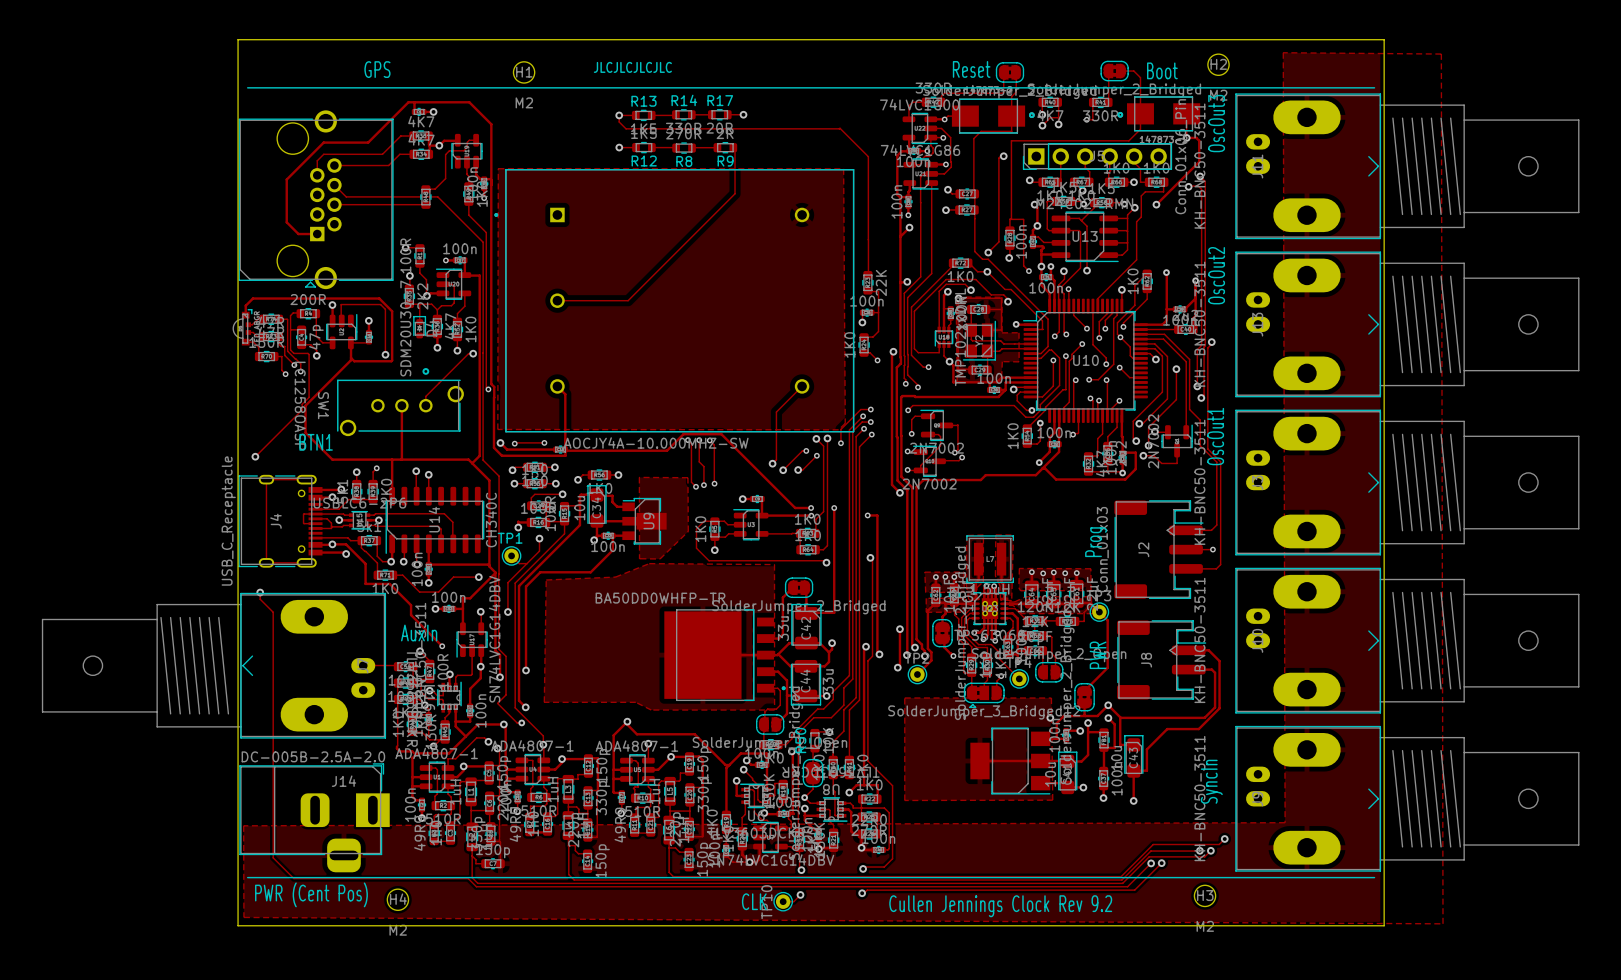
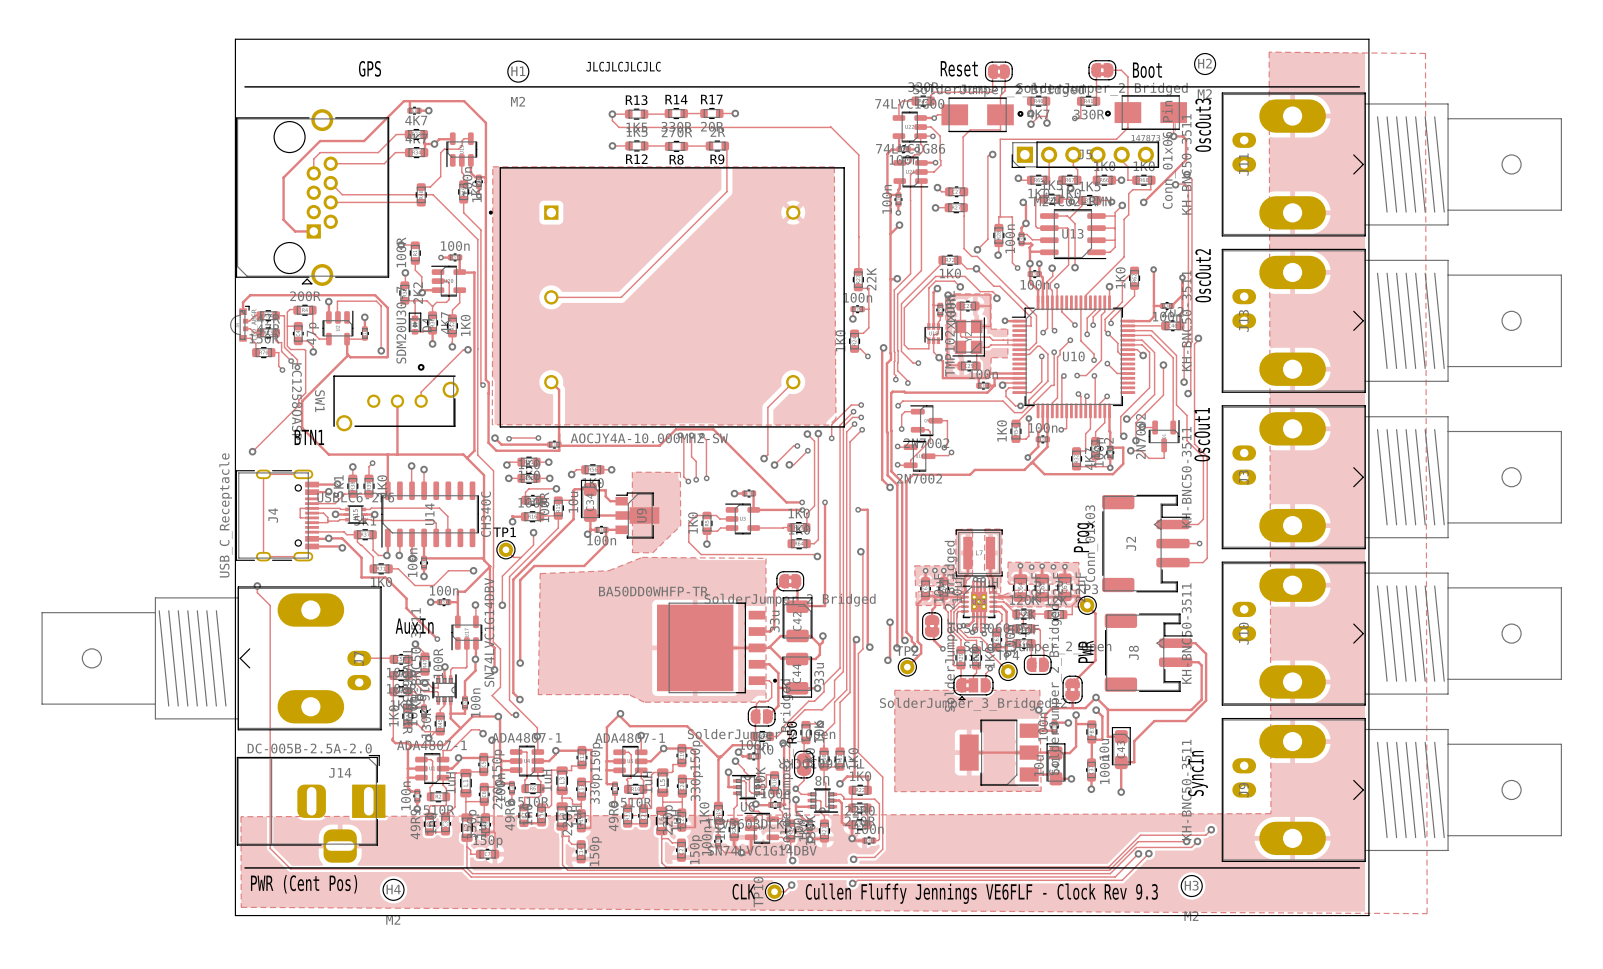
text: Cullen Jennings Clock Rev 9.2 (1000, 906) -> Cullen Fluffy Jennings VE6FLF - Clock Rev 9.3 (981, 893)

